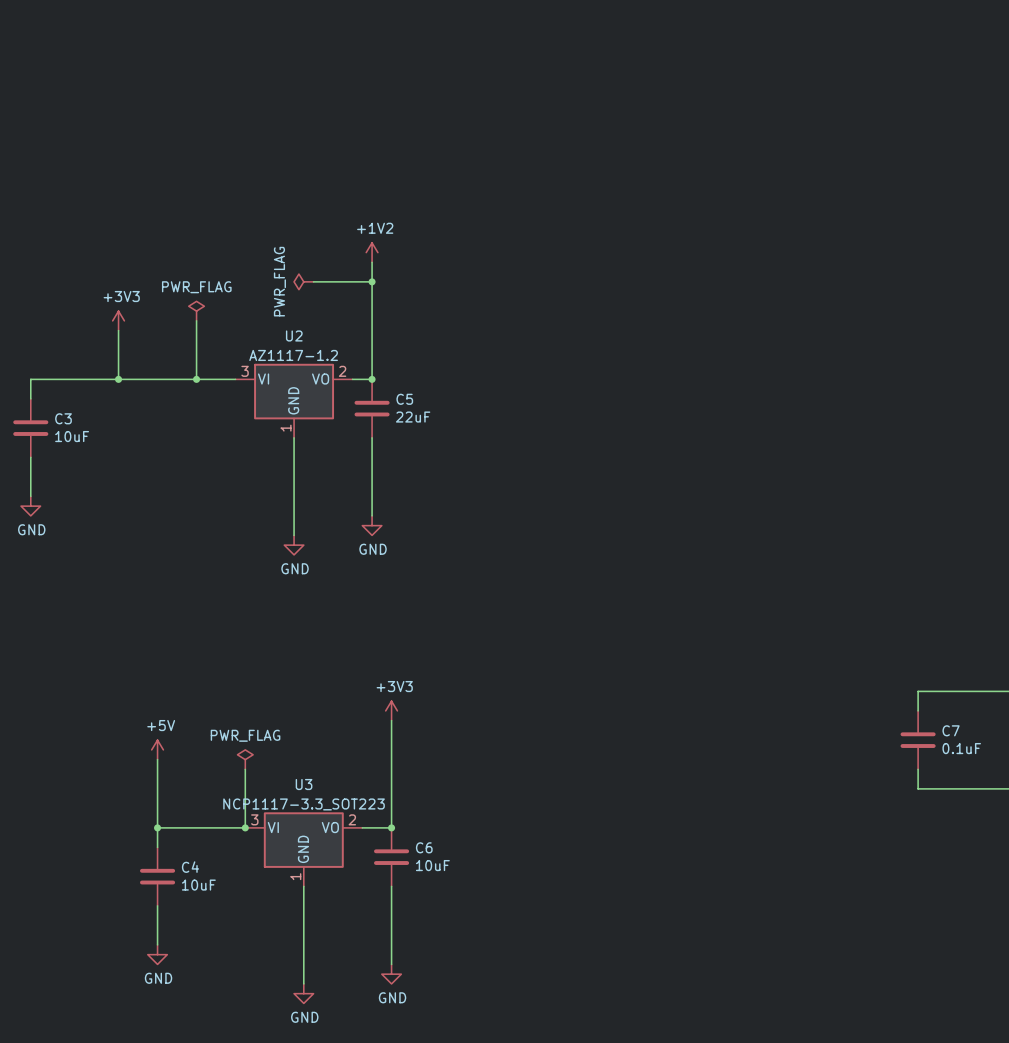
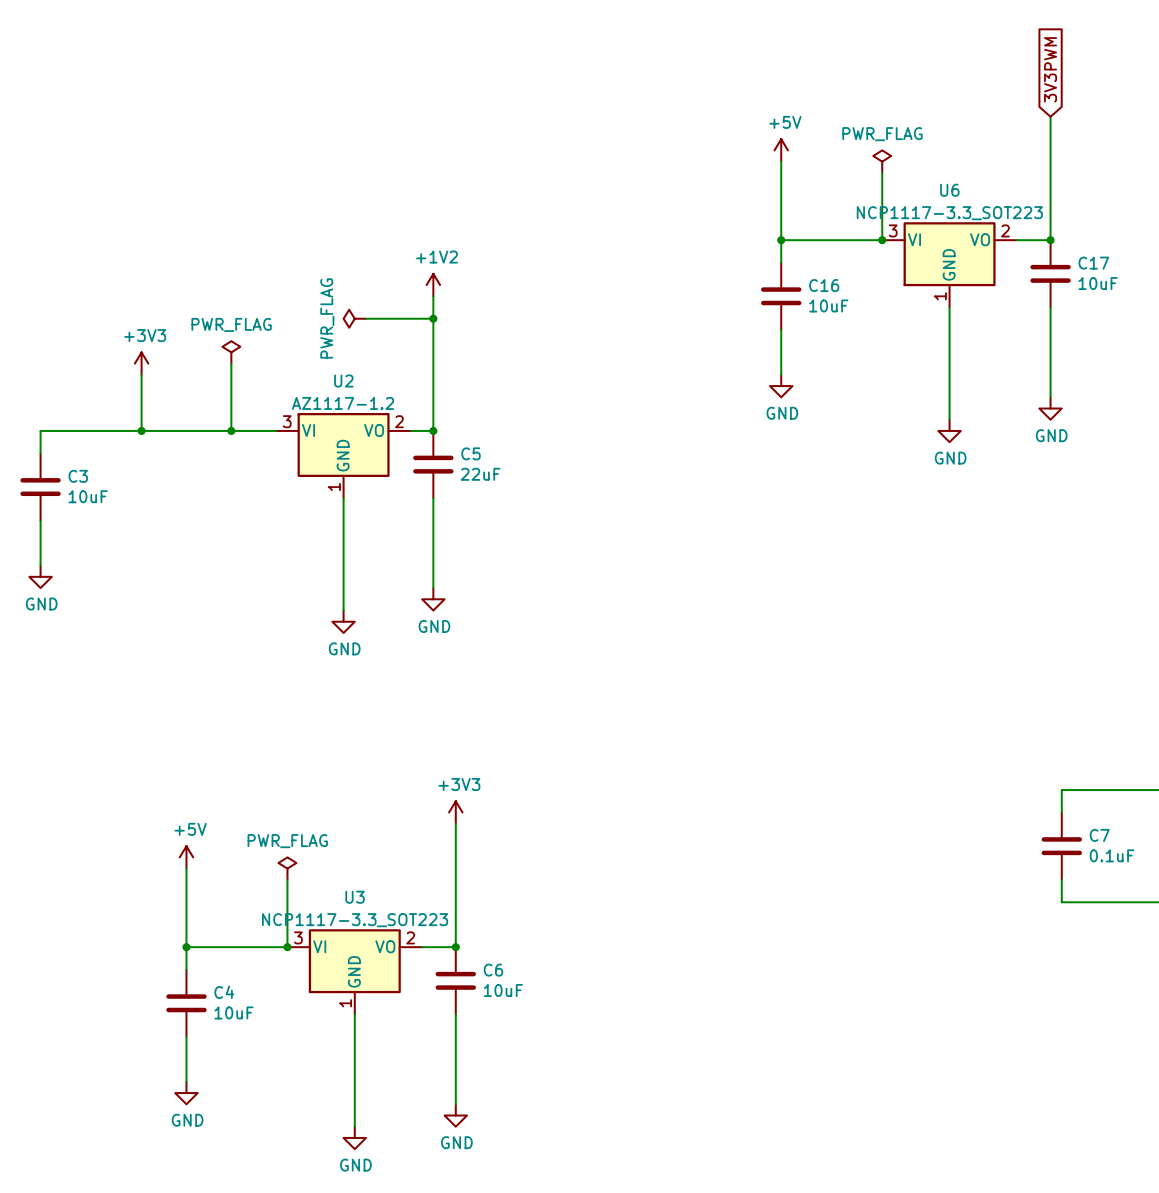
global label: none -> 3V3PWM (1050, 69)
wire: none -> (1050, 116) (1050, 240) (1016, 240)
power symbol: none -> +5V (781, 150)
wire: none -> (781, 161) (781, 262)
power symbol: none -> PWR_FLAG (882, 161)
wire: none -> (882, 172) (882, 240) (781, 240)
junction: none -> (781, 240)
junction: none -> (882, 240)
junction: none -> (1050, 240)
U6: none -> NCP1117-3.3_SOT223 (949, 264)
C17: none -> 10uF (1050, 273)
C16: none -> 10uF (781, 296)
wire: none -> (949, 307) (949, 419)
wire: none -> (1050, 307) (1050, 397)
wire: none -> (781, 329) (781, 374)
power symbol: none -> GND (781, 386)
power symbol: none -> GND (1050, 408)
power symbol: none -> GND (949, 430)

